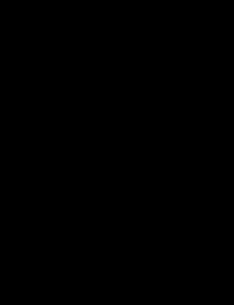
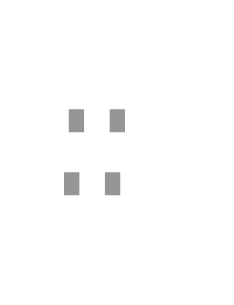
part: none -> (96, 120)
part: none -> (92, 183)

